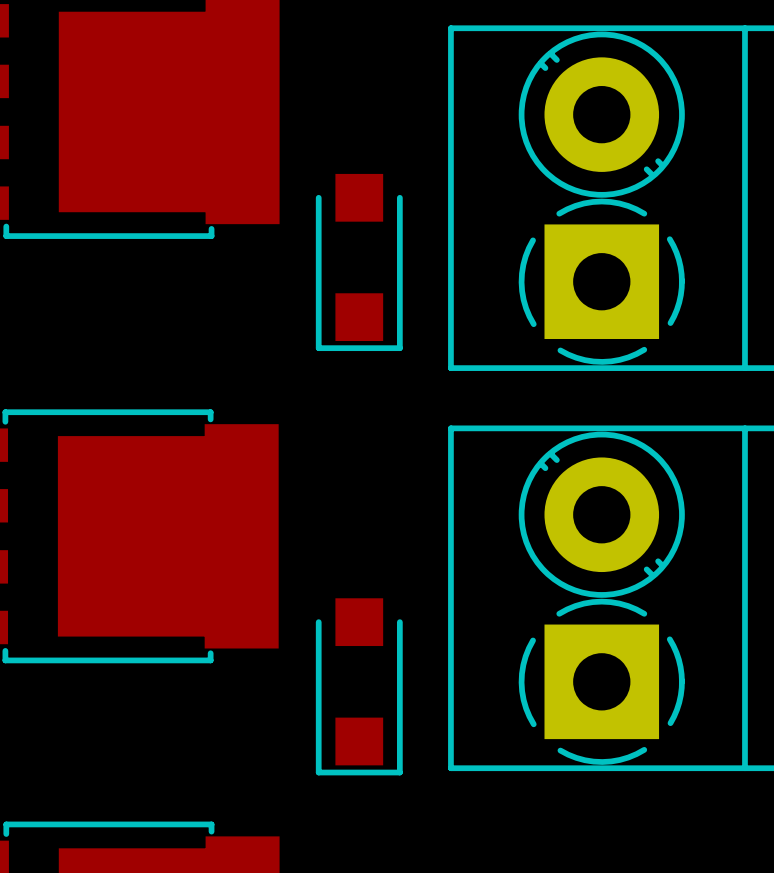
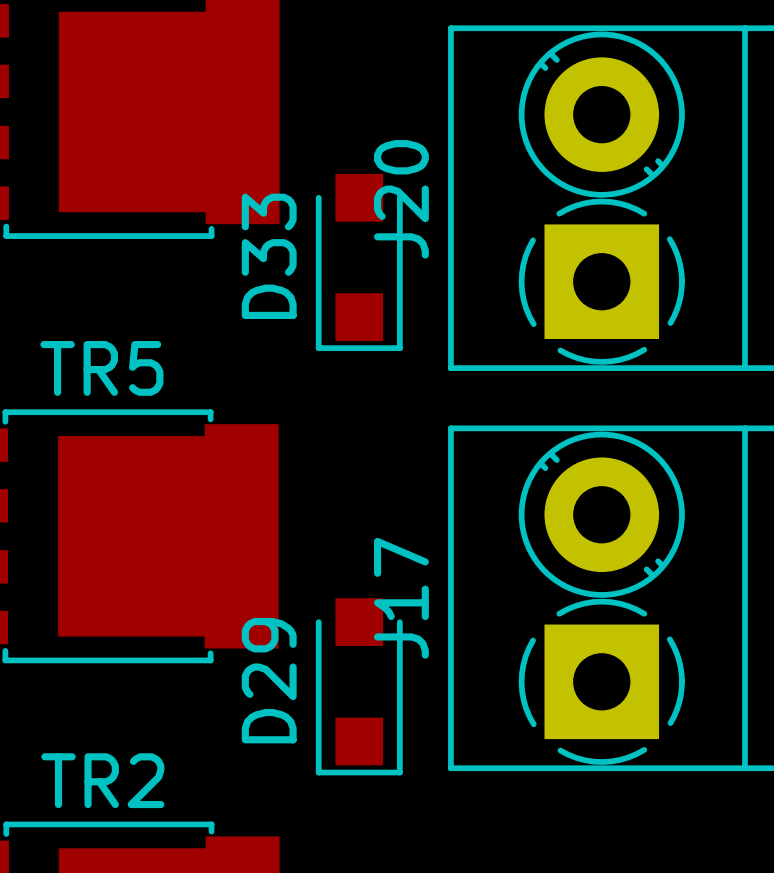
J20 name: none -> J20 (401, 199)
D33 name: none -> D33 (269, 256)
TR5 name: none -> TR5 (101, 368)
J17 name: none -> J17 (401, 598)
D29 name: none -> D29 (269, 680)
TR2 name: none -> TR2 (102, 780)

